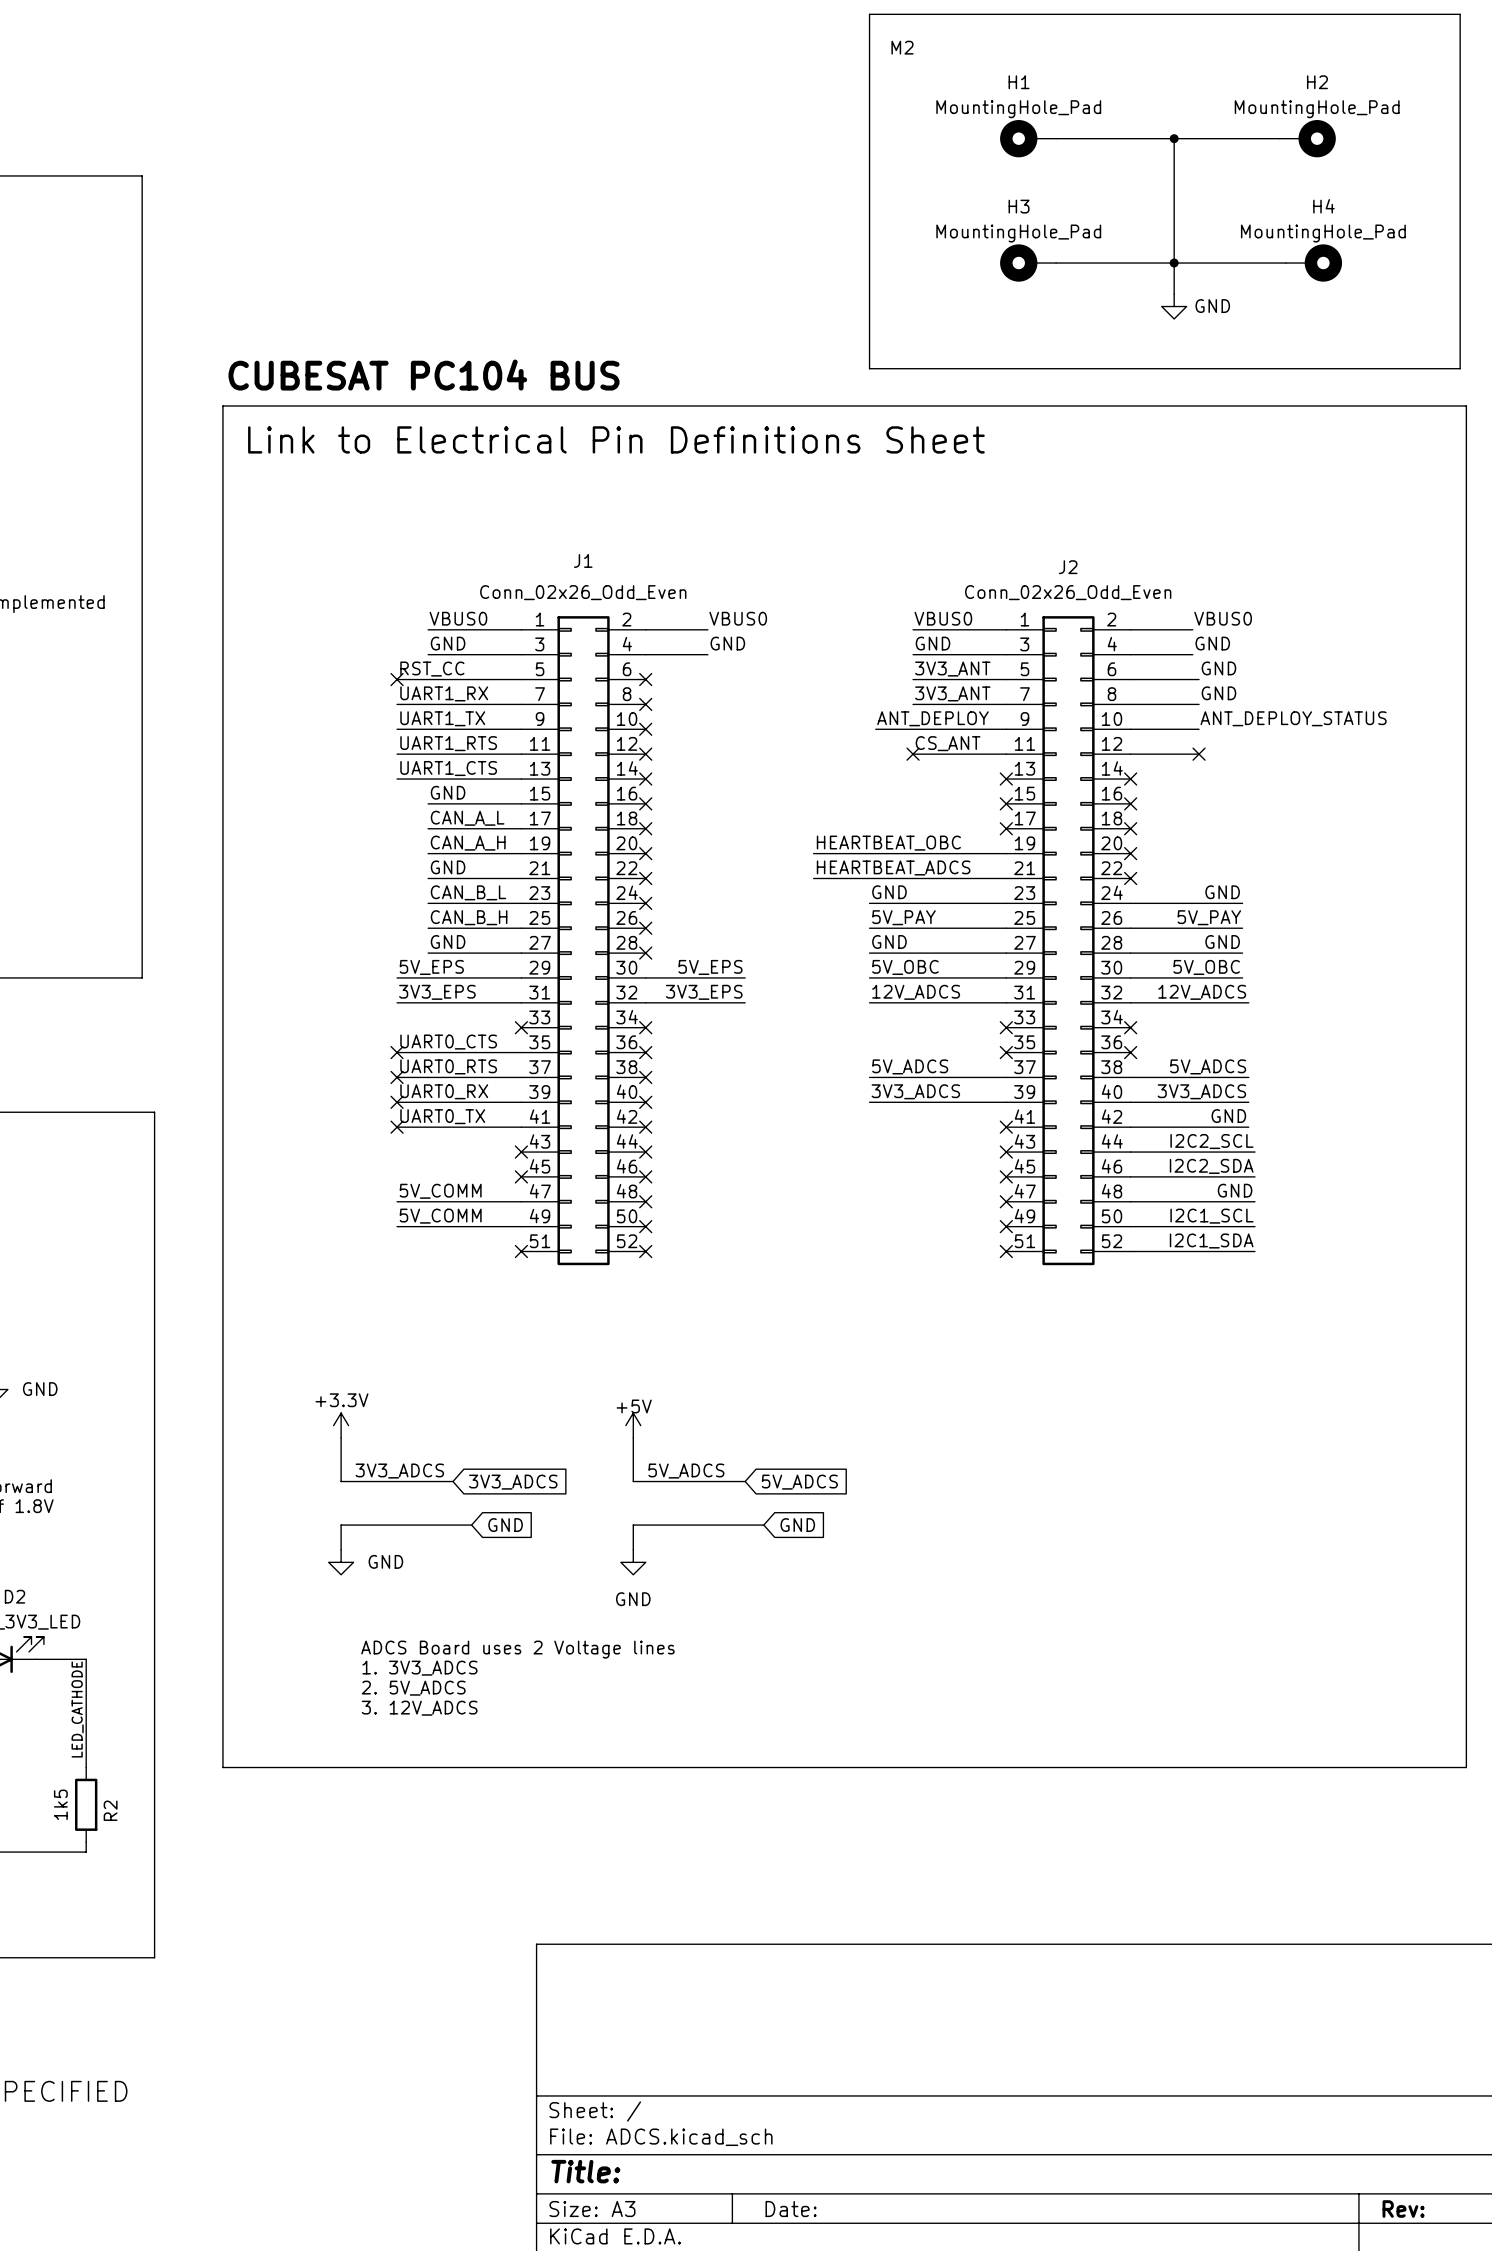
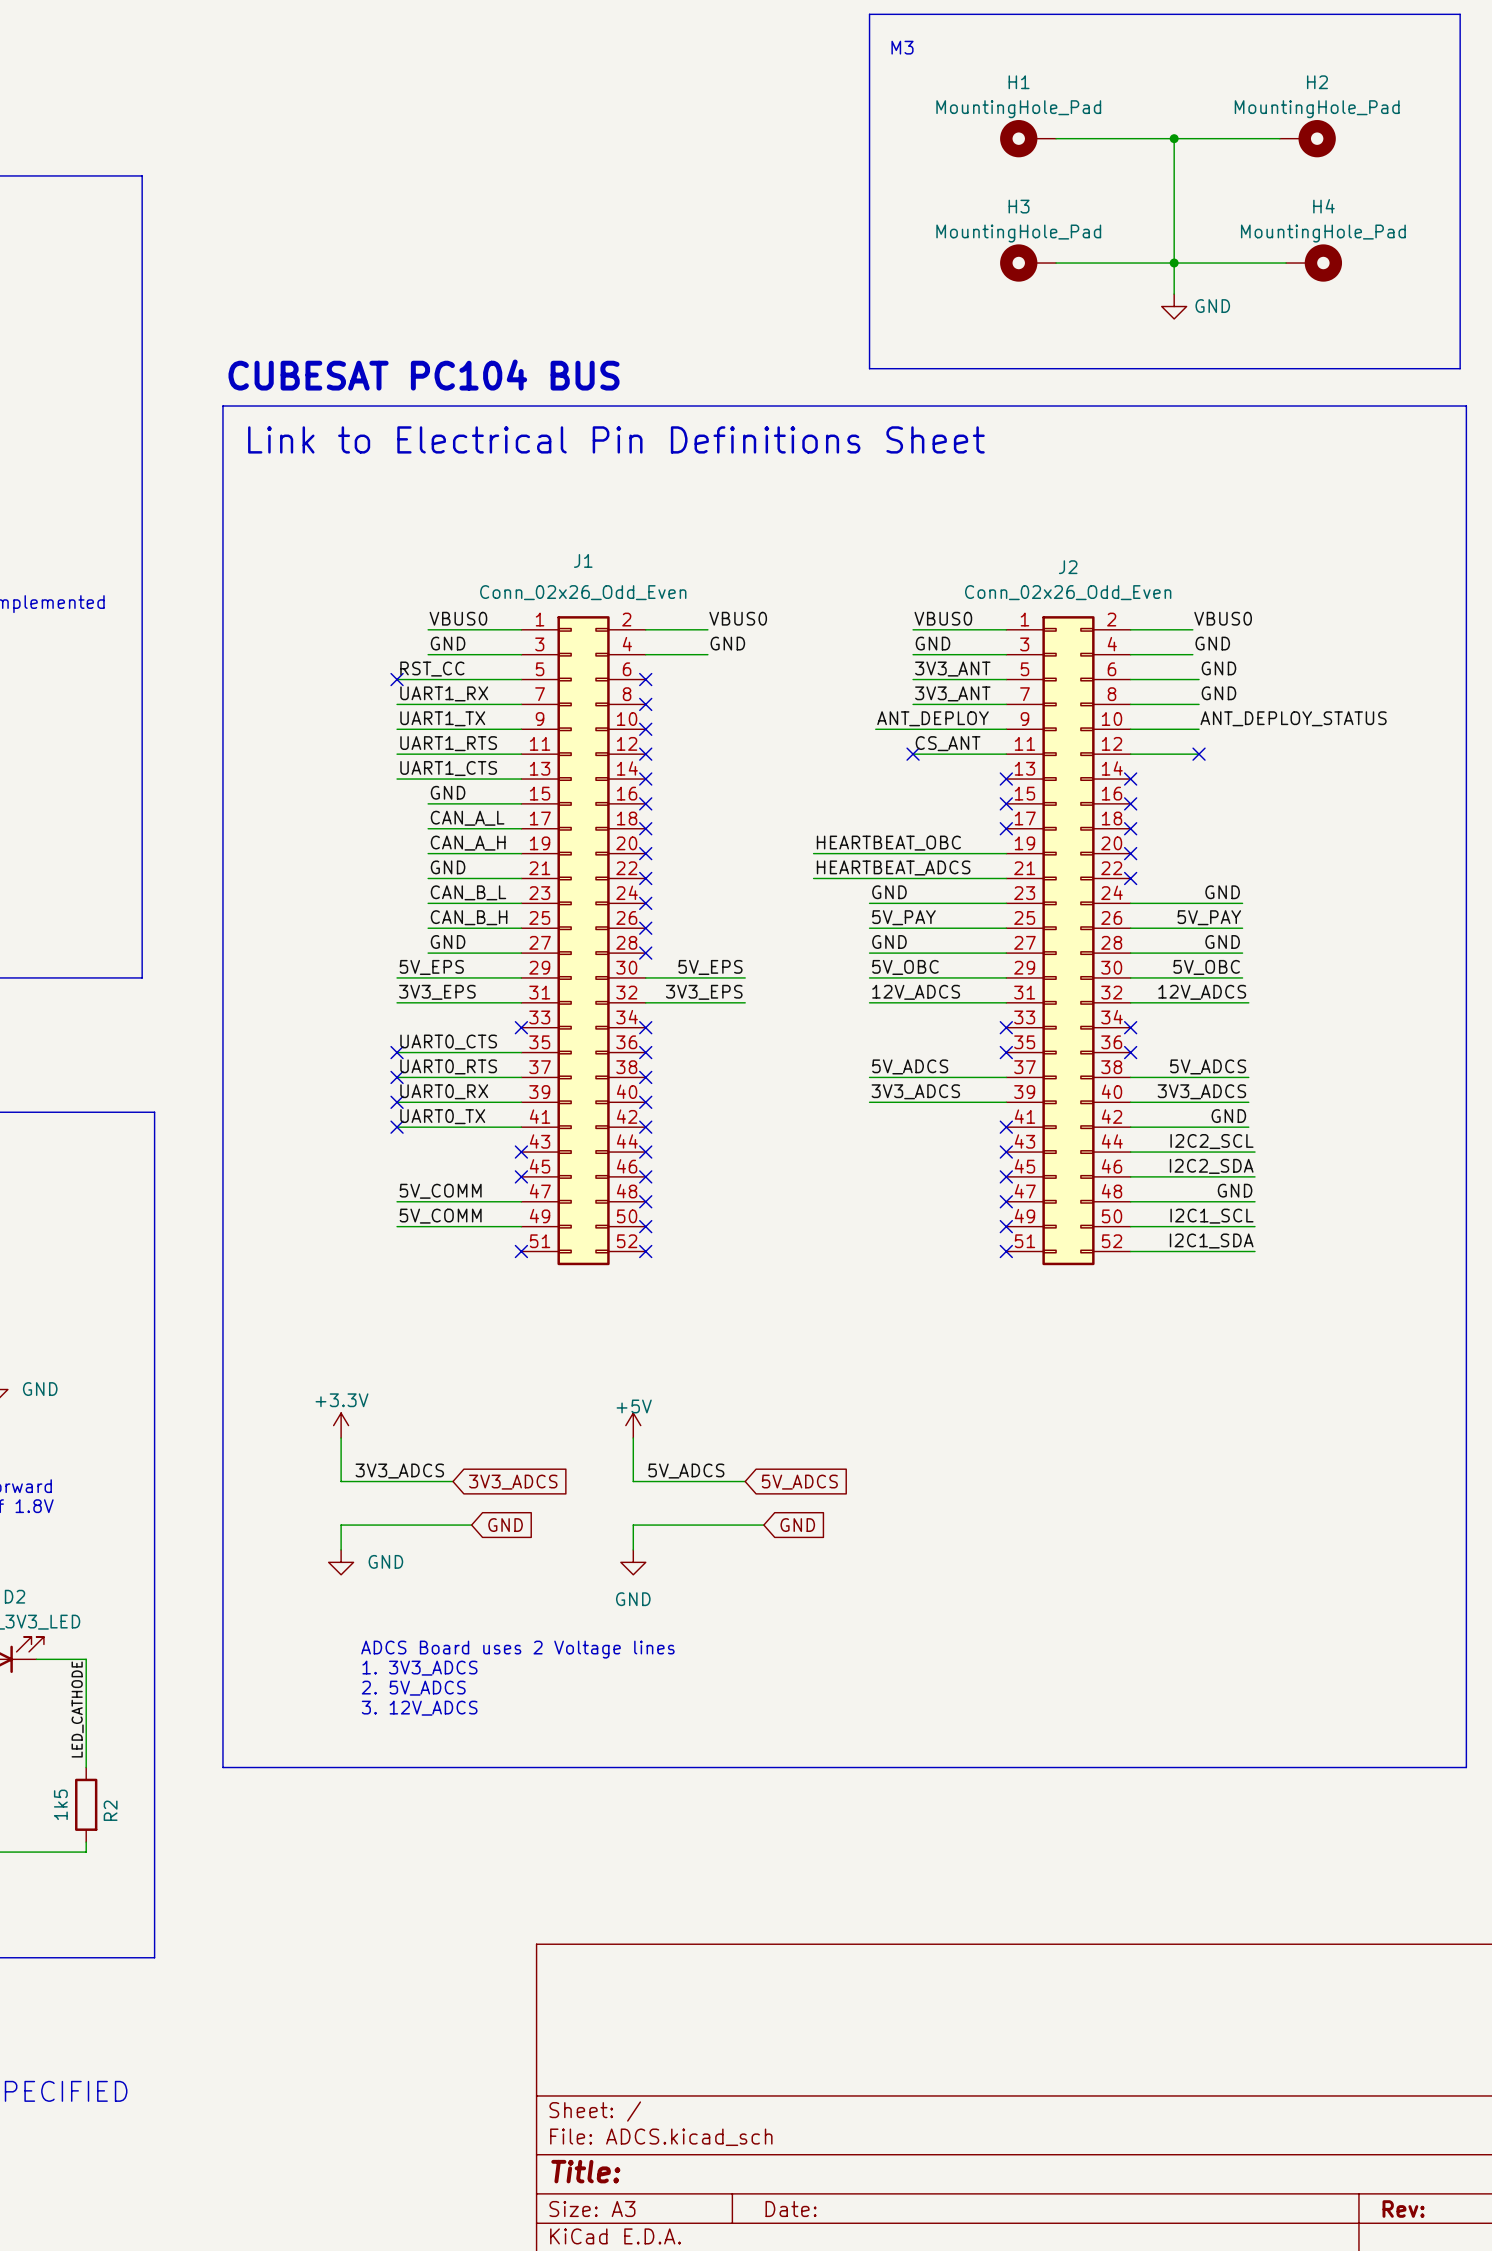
text: M2 (902, 47) -> M3 (902, 47)

